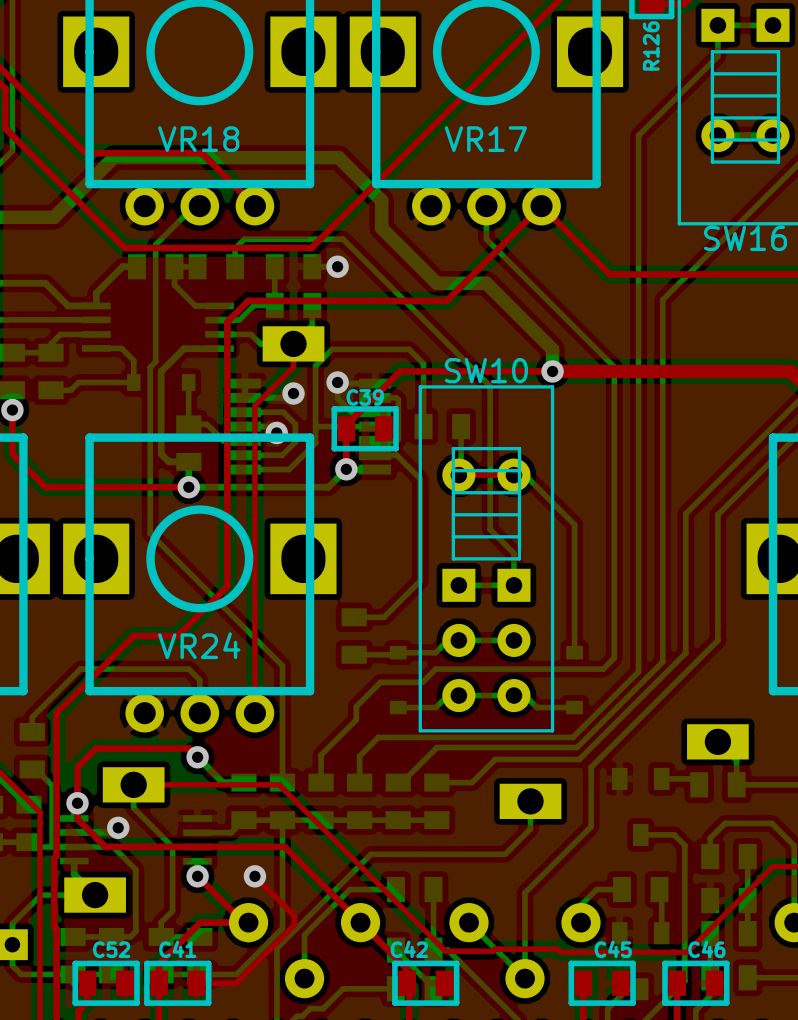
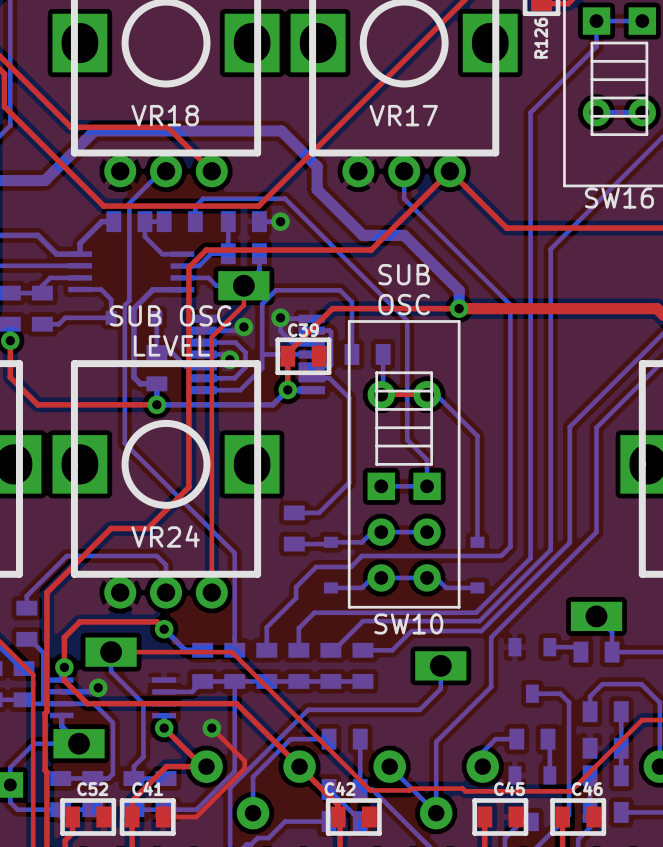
text: none -> SUB (404, 274)
text: none -> OSC (404, 304)
SW10 name position: SW10 (486, 370) -> SW10 (408, 623)
text: none -> SUB OSC (170, 315)
text: none -> LEVEL (171, 345)

